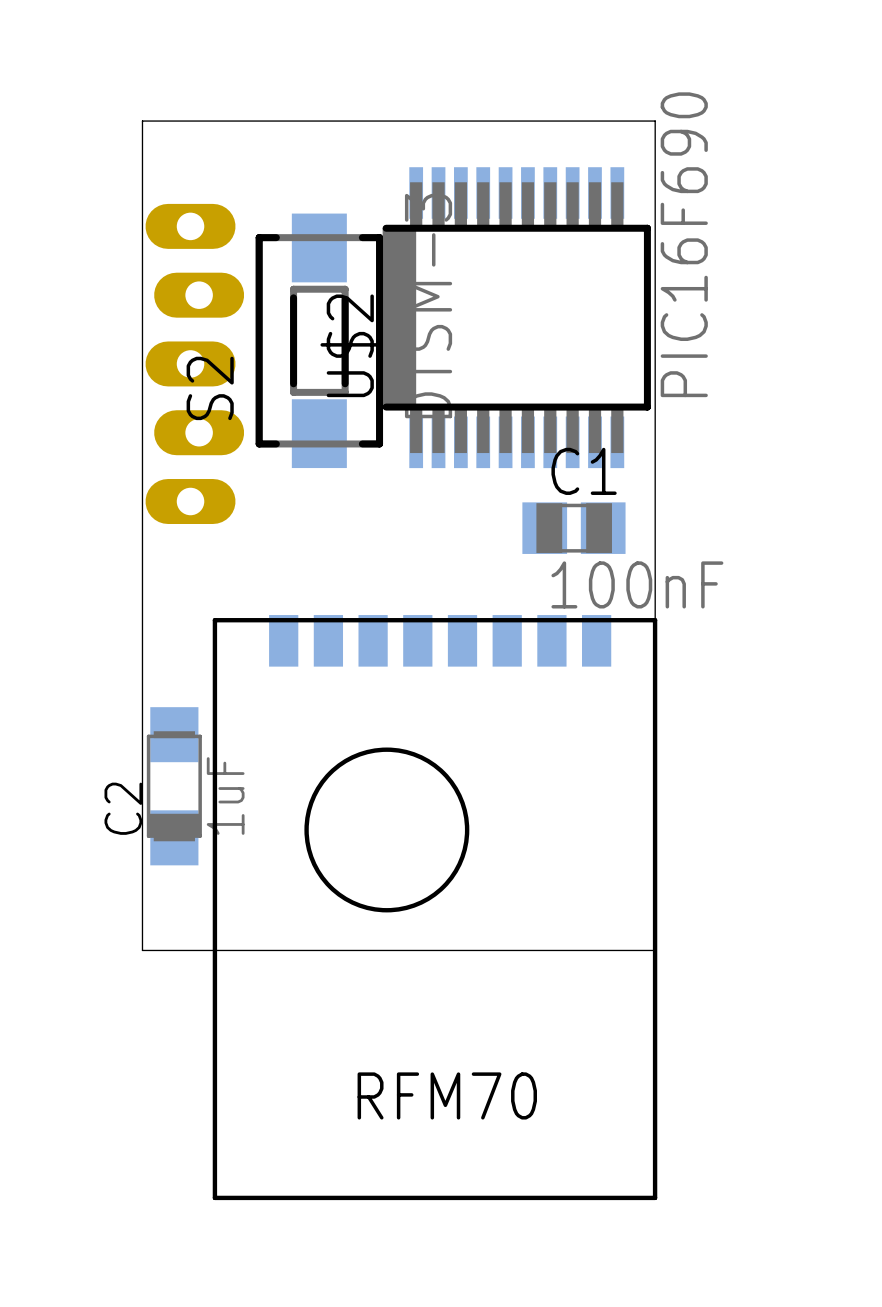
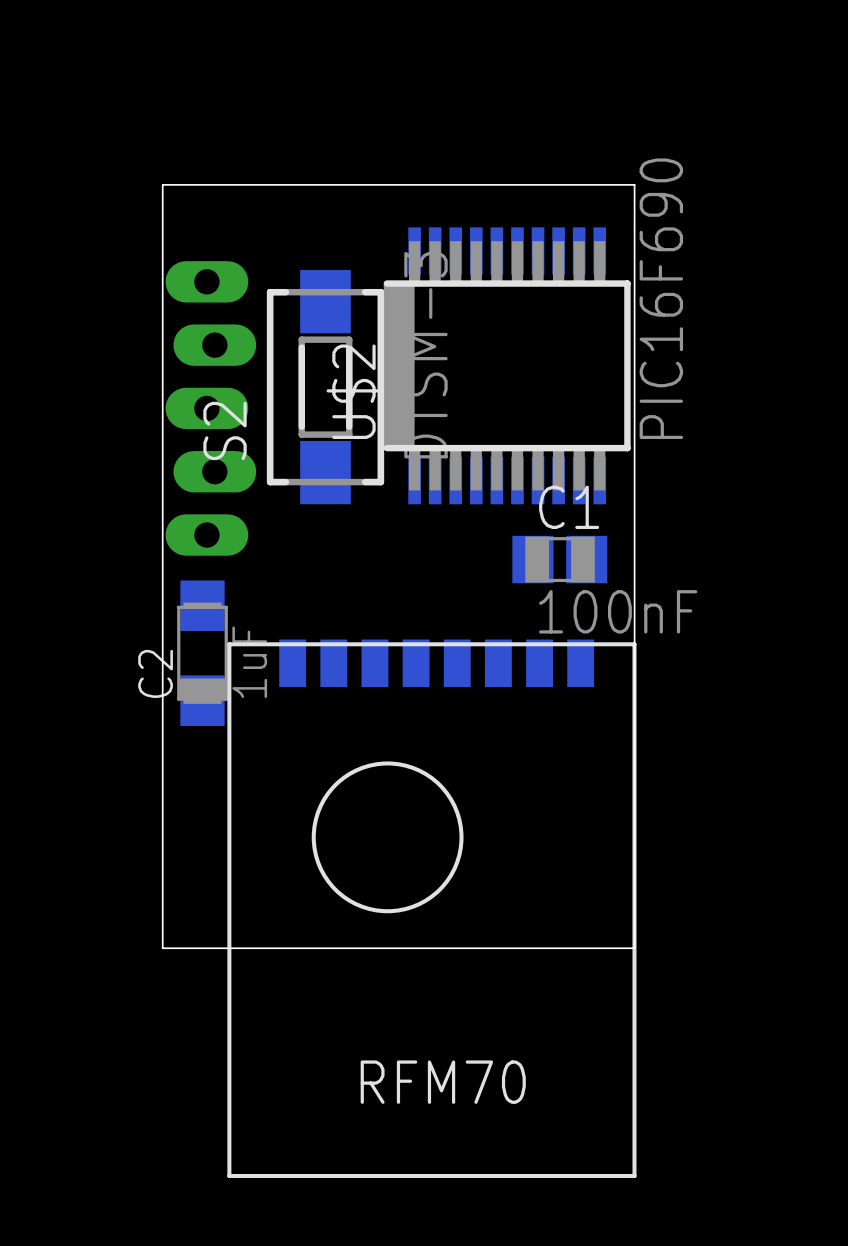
C2 position: (174, 786) -> (202, 653)

